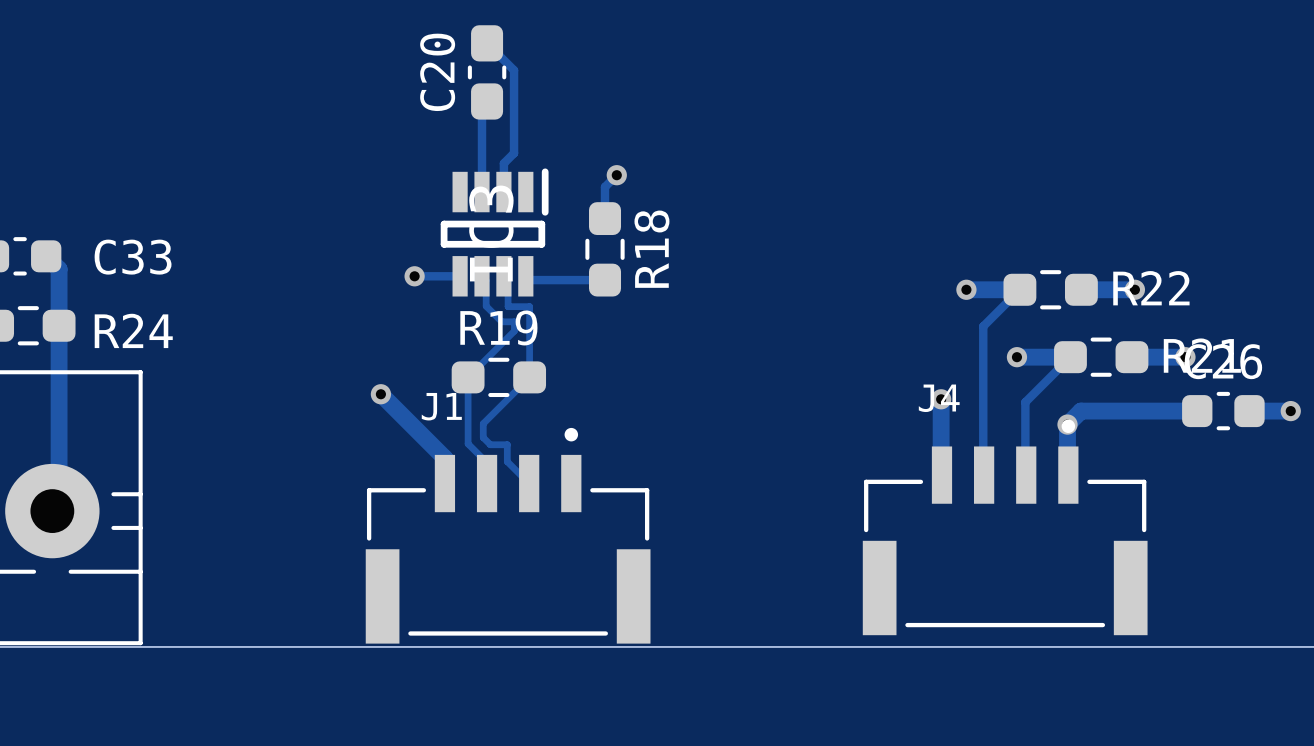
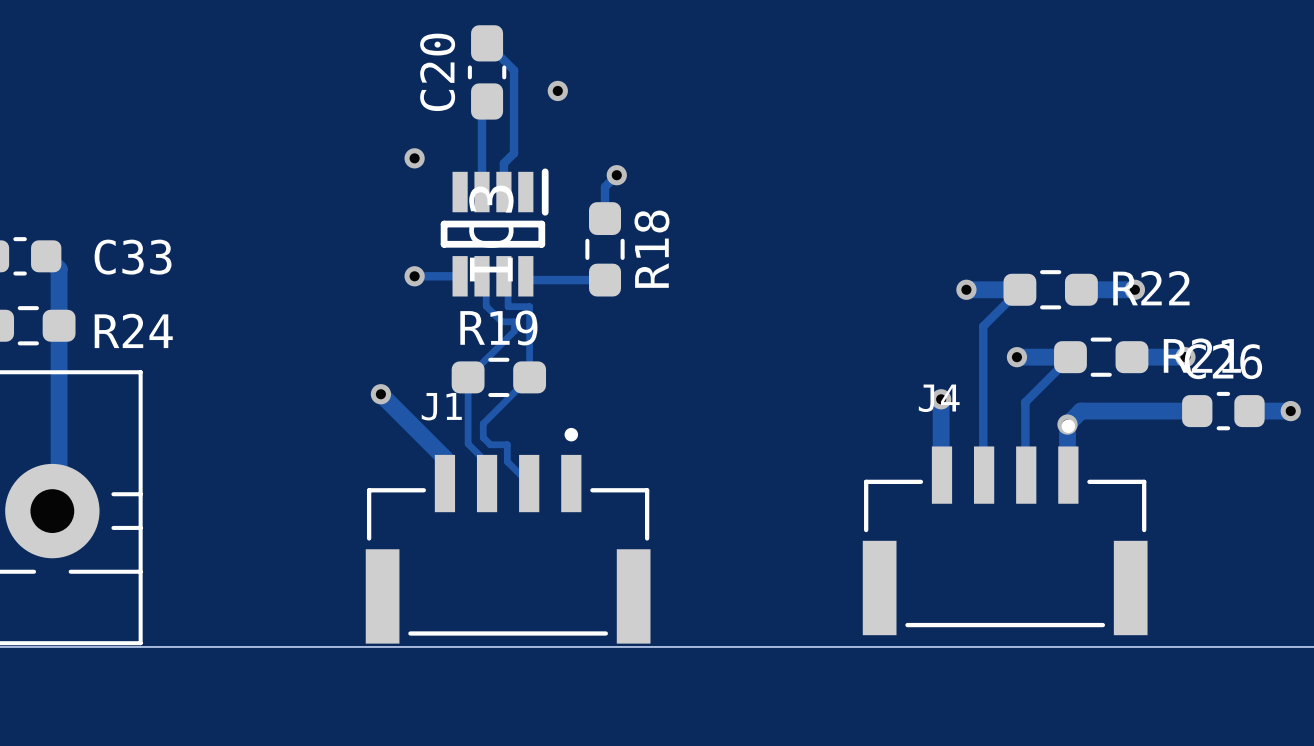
via: none -> (557, 90)
via: none -> (414, 158)

